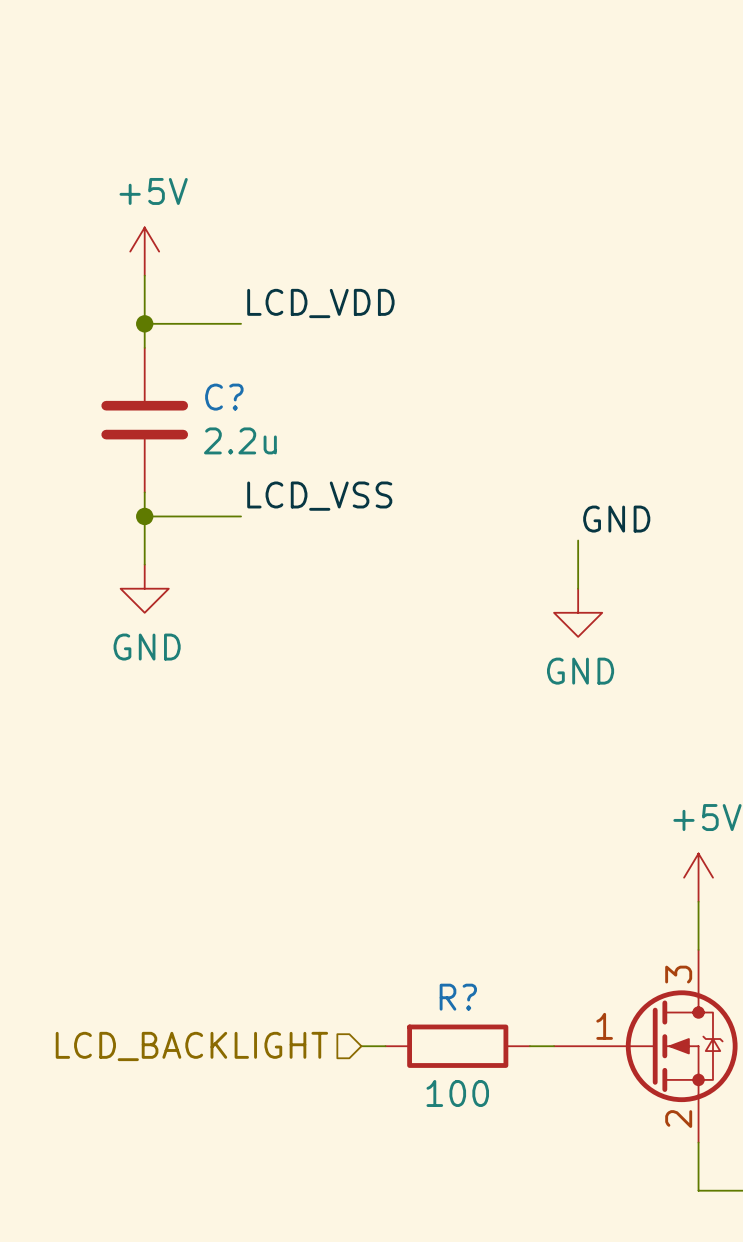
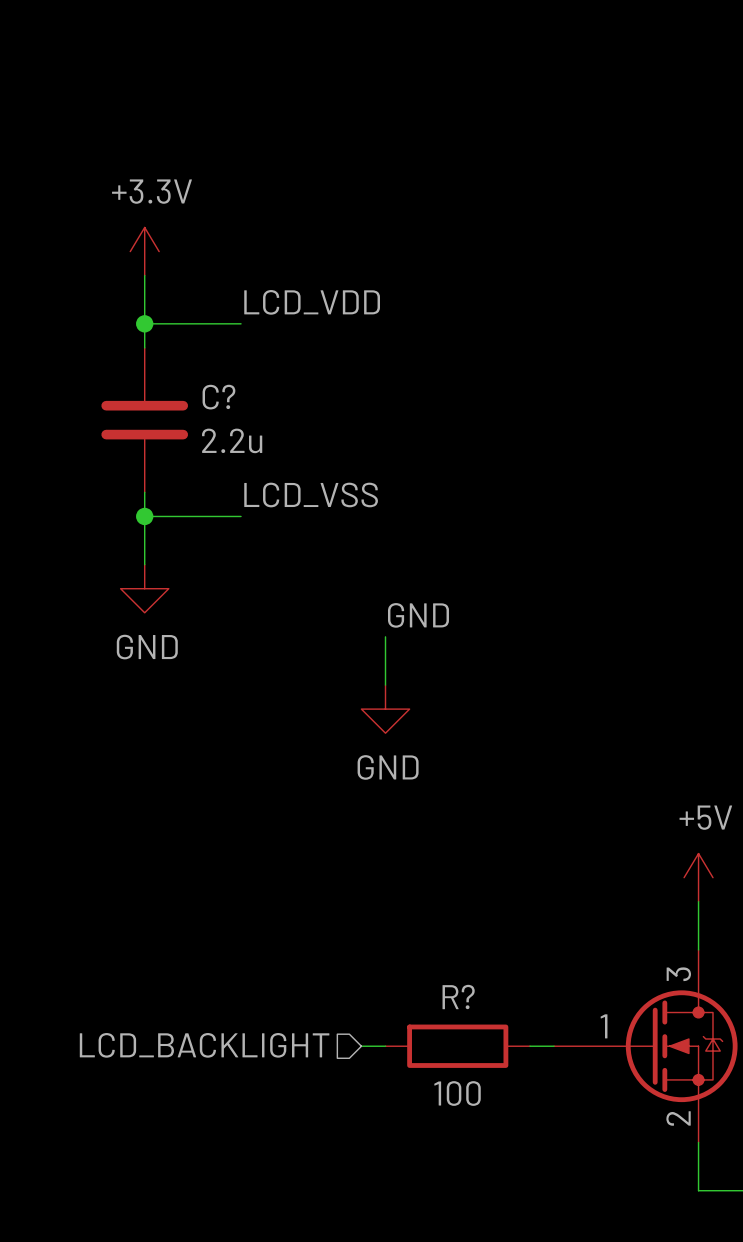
power symbol: +5V (144, 251) -> +3.3V (144, 251)
label position: GND (616, 519) -> GND (418, 615)
wire: (578, 540) (578, 588) -> (385, 636) (385, 685)
power symbol: GND (578, 612) -> none
power symbol: none -> GND (385, 709)

